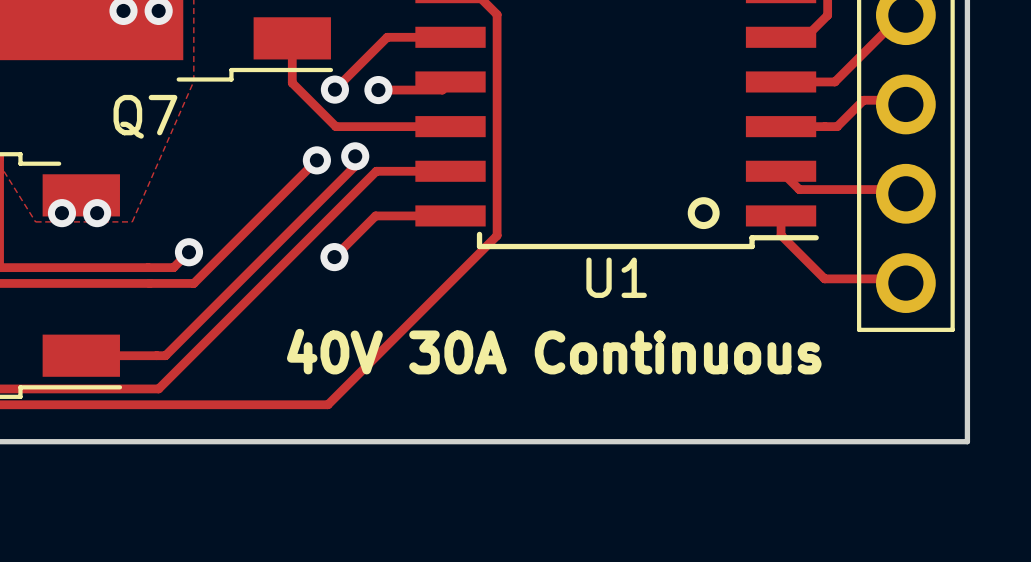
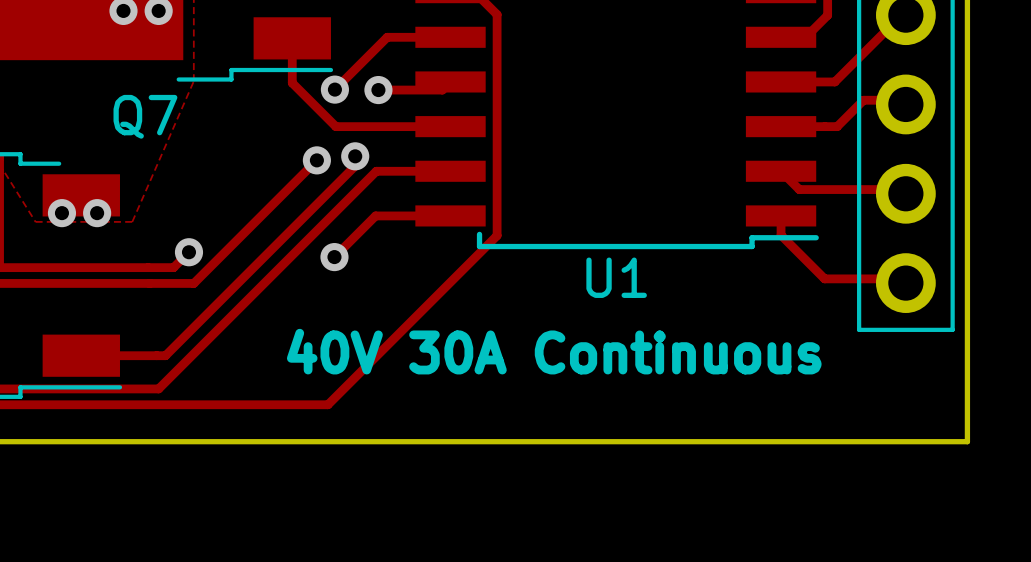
drawing: [687, 197, 720, 230] -> none

